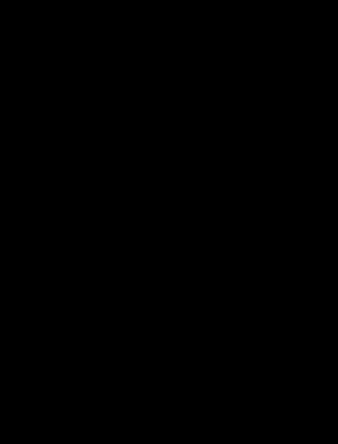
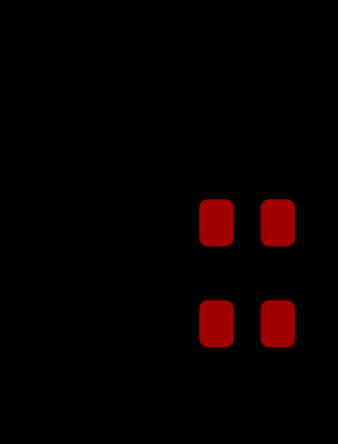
part: none -> (247, 222)
part: none -> (247, 323)

